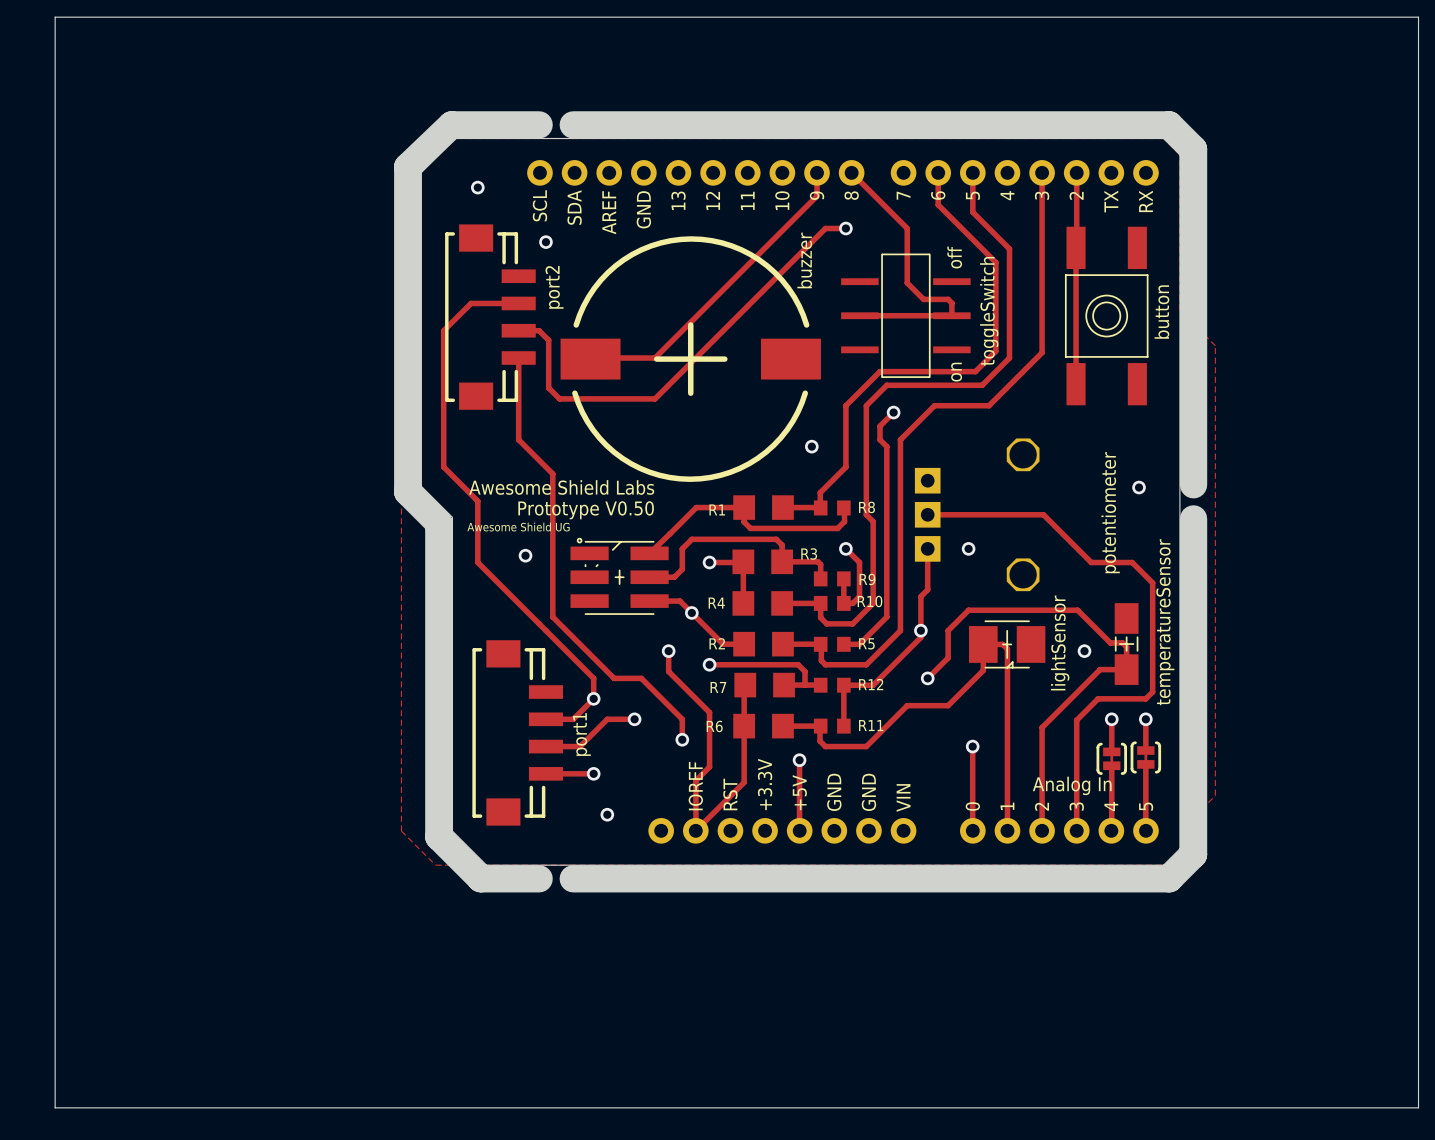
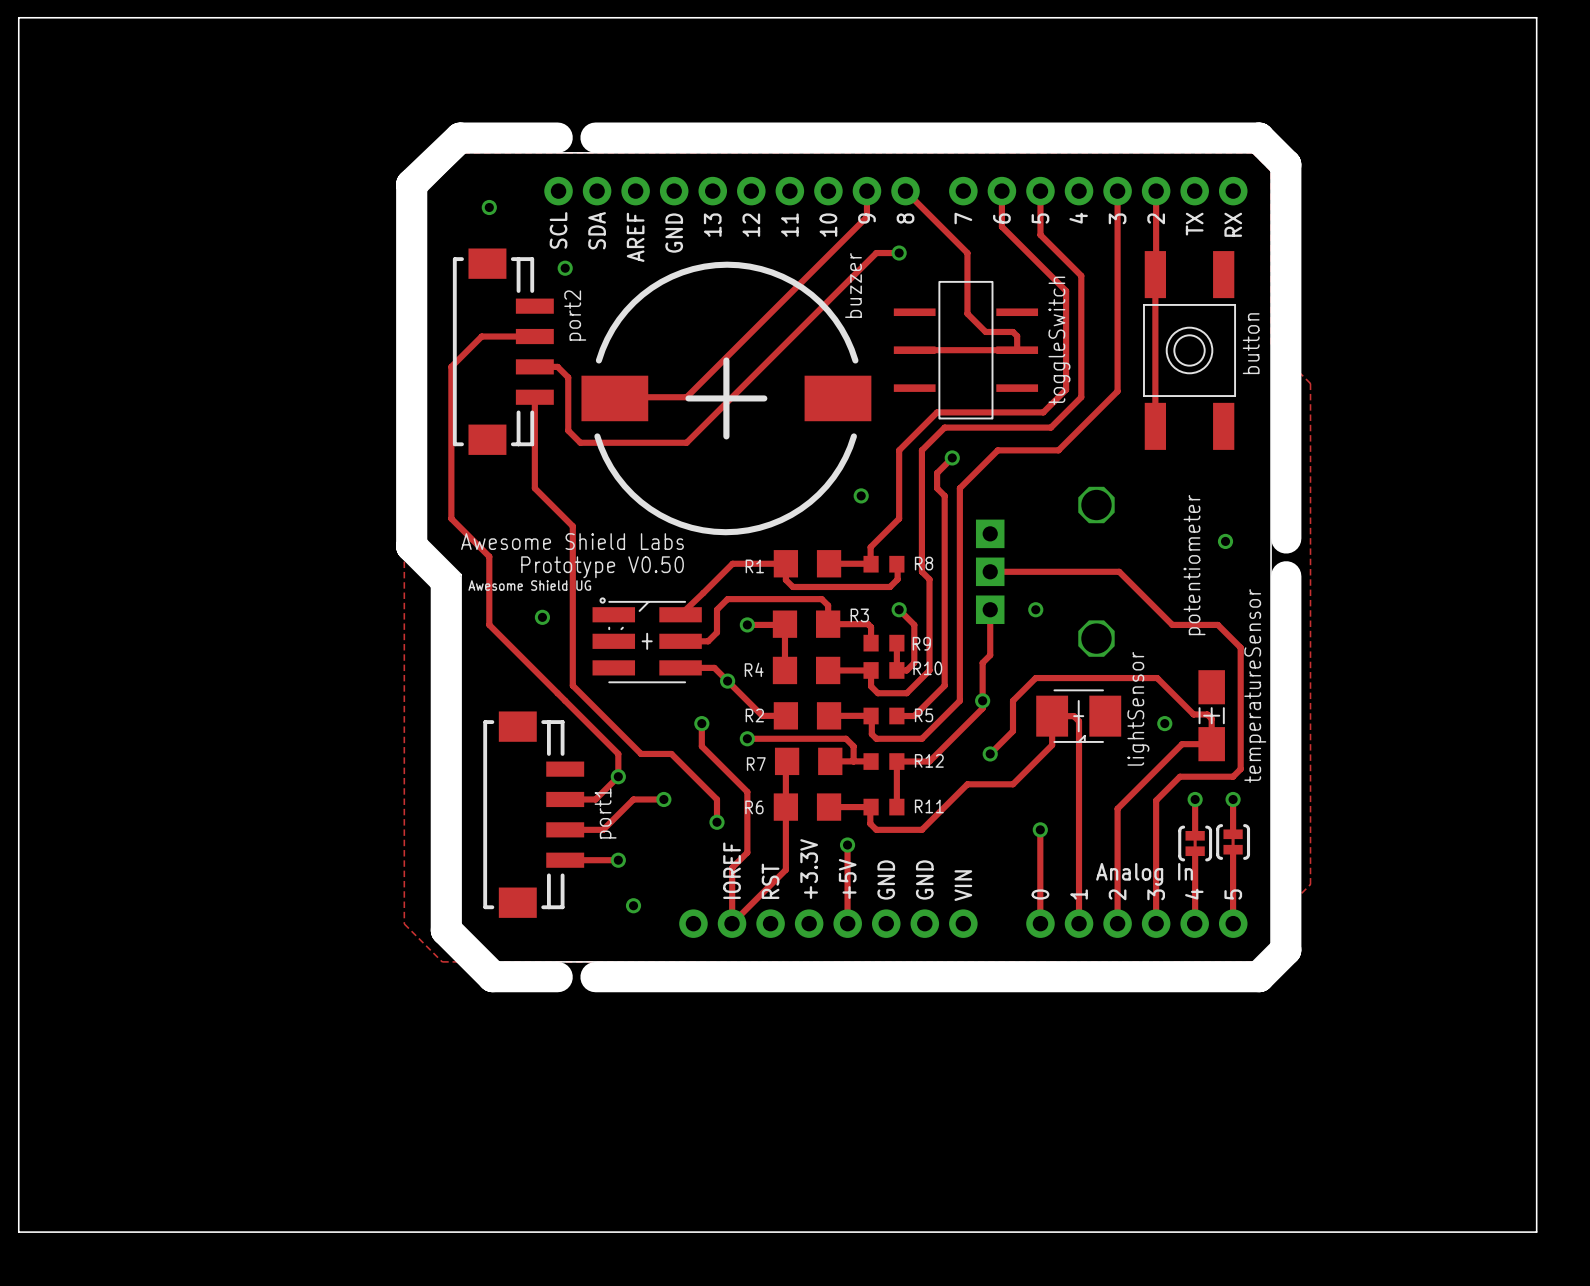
text: off (954, 257) -> none
text: on (956, 372) -> none

